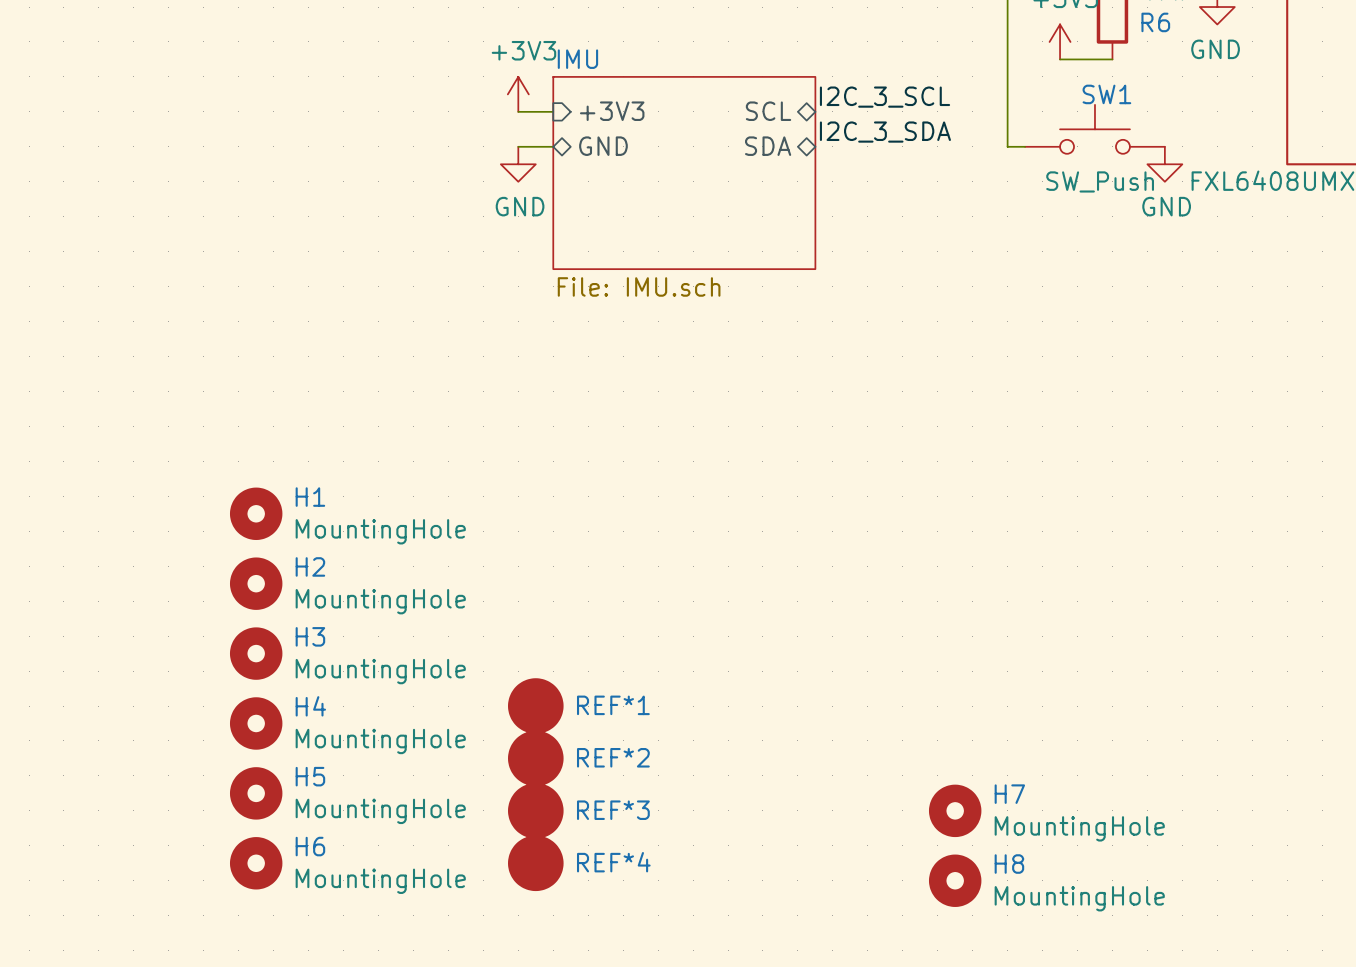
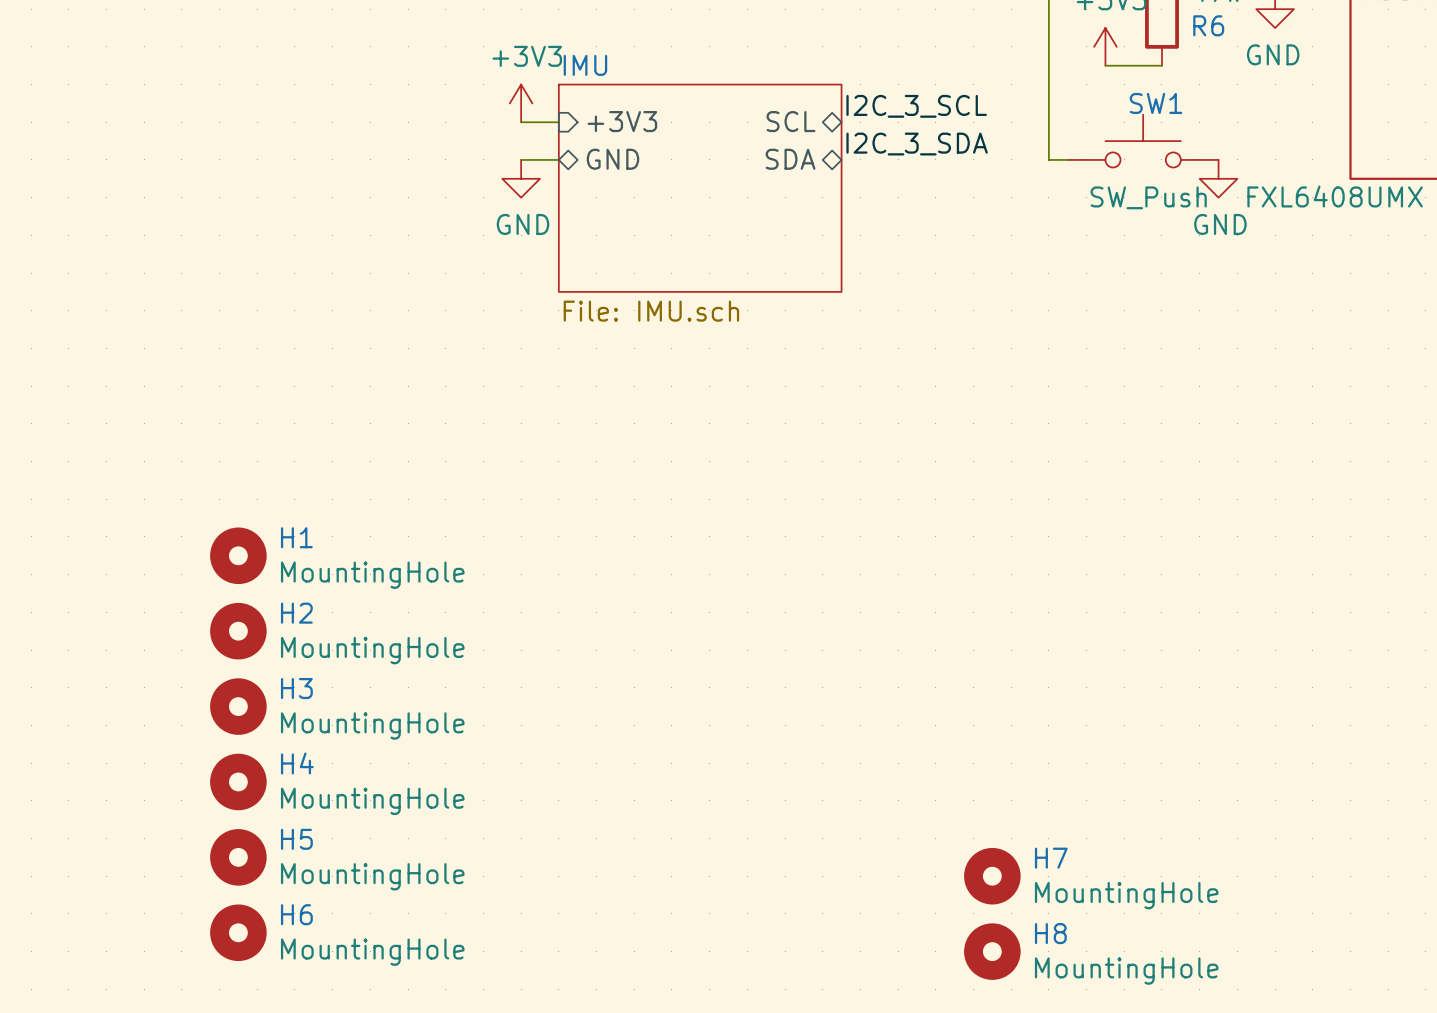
REF*1: (535, 706) -> none
REF*2: (535, 758) -> none
REF*3: (535, 810) -> none
REF*4: (535, 863) -> none

